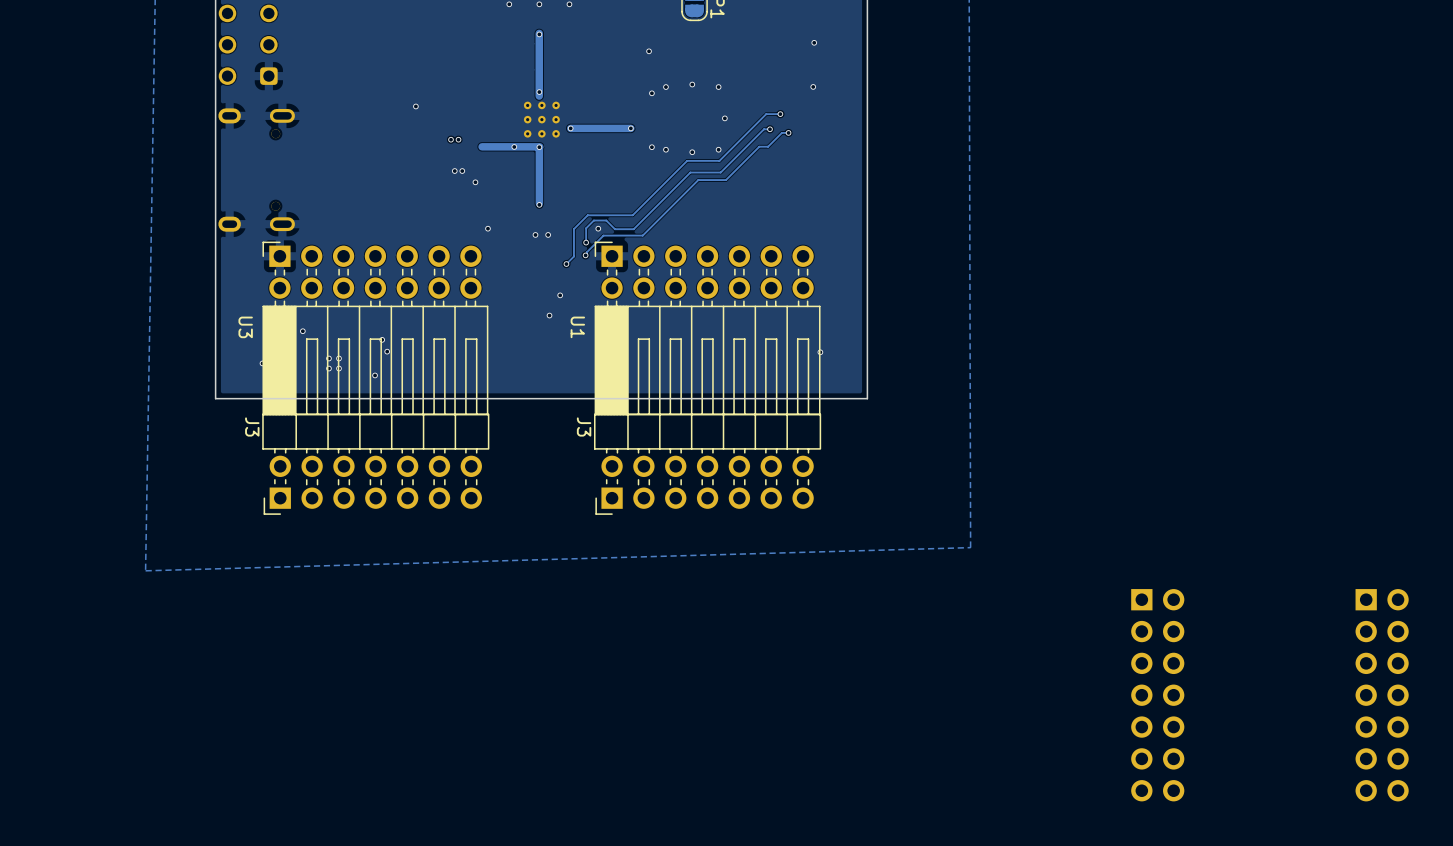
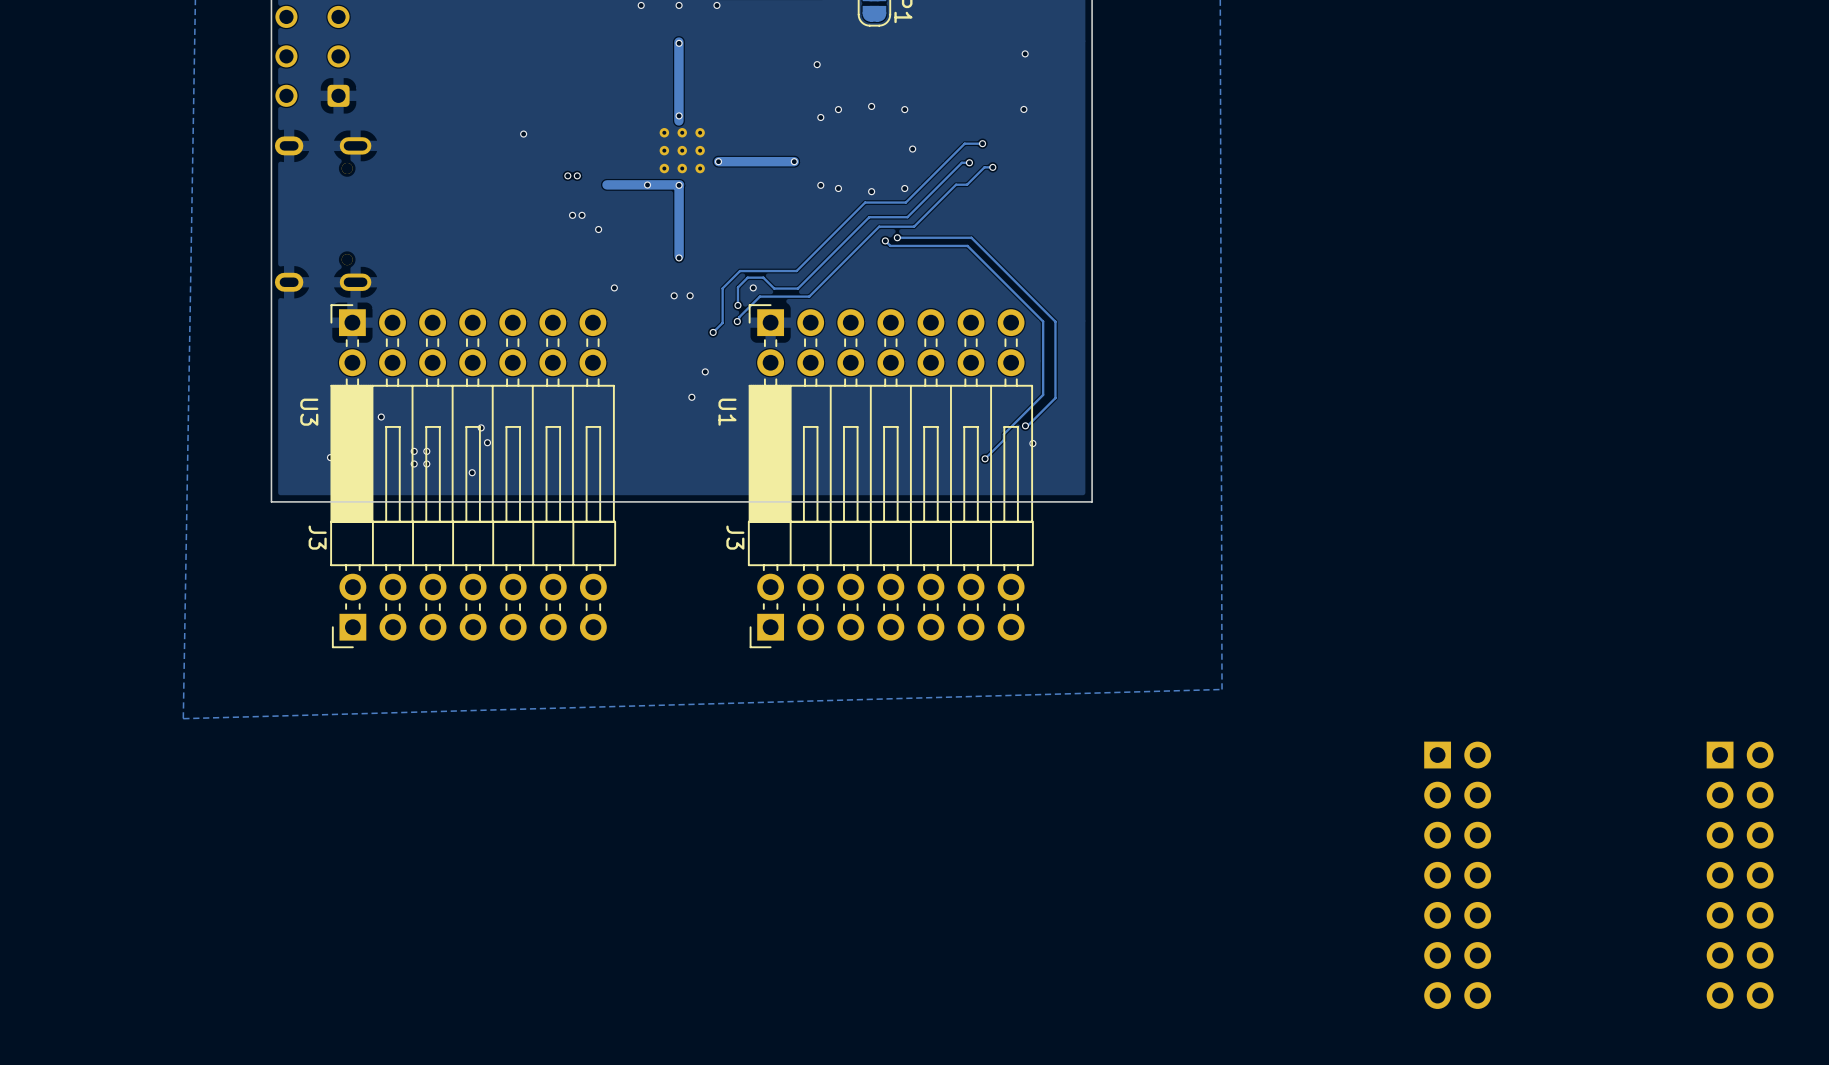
track: none -> (897, 237) (971, 237) (1055, 321) (1055, 398) (1027, 425) (1025, 425)
via: none -> (897, 237)
track: none -> (885, 240) (890, 245) (967, 245) (1043, 321) (1043, 394) (1003, 434) (1003, 440) (985, 458)
via: none -> (885, 240)
via: none -> (1025, 425)
via: none -> (985, 458)

